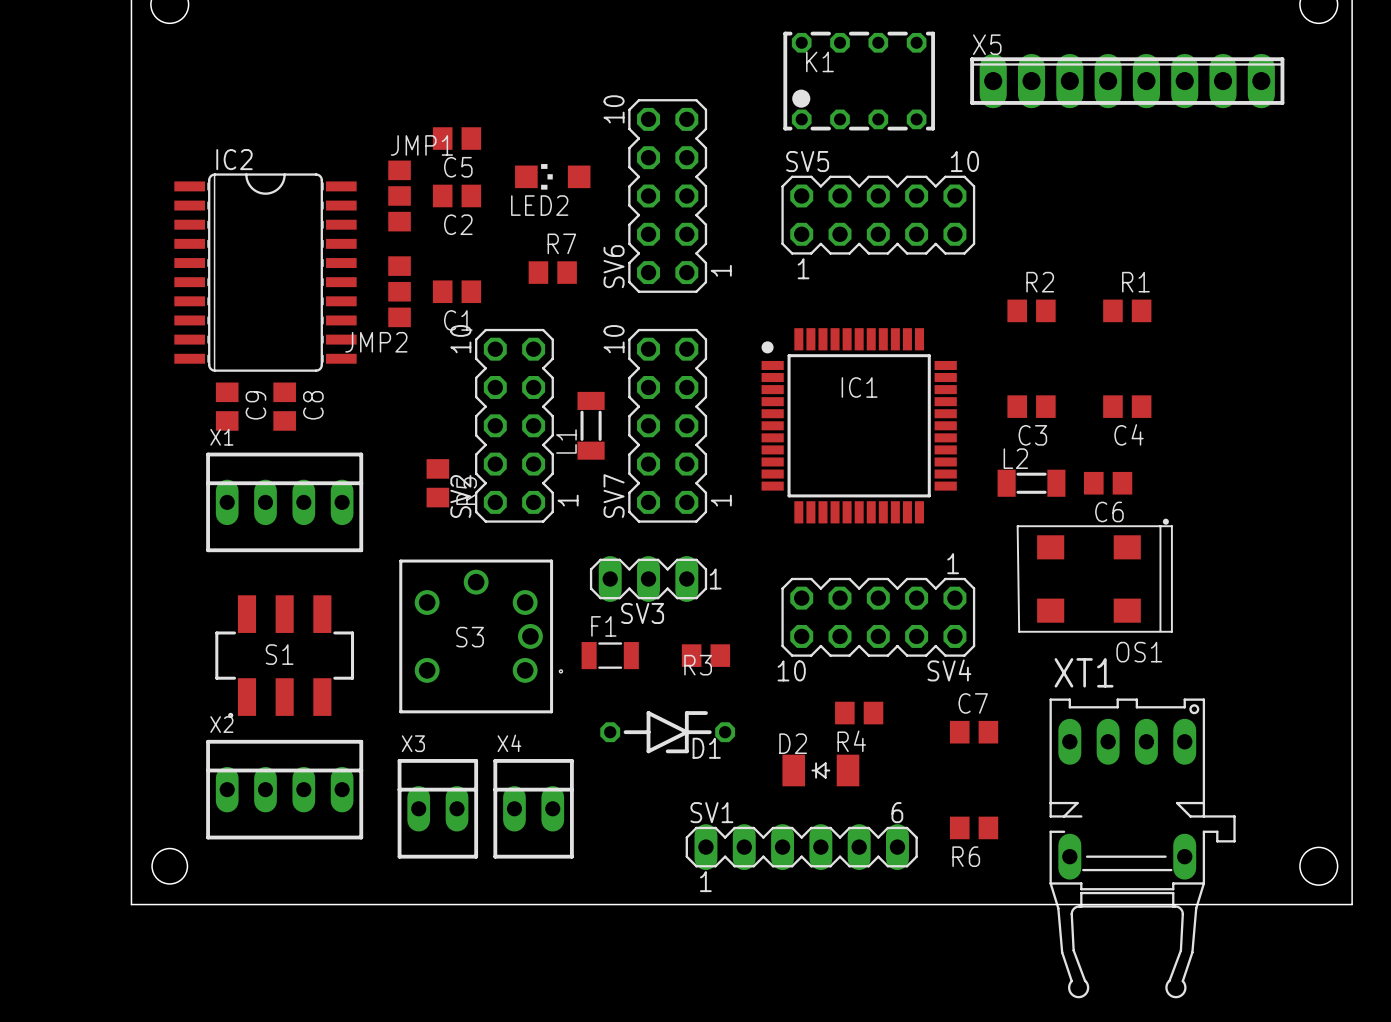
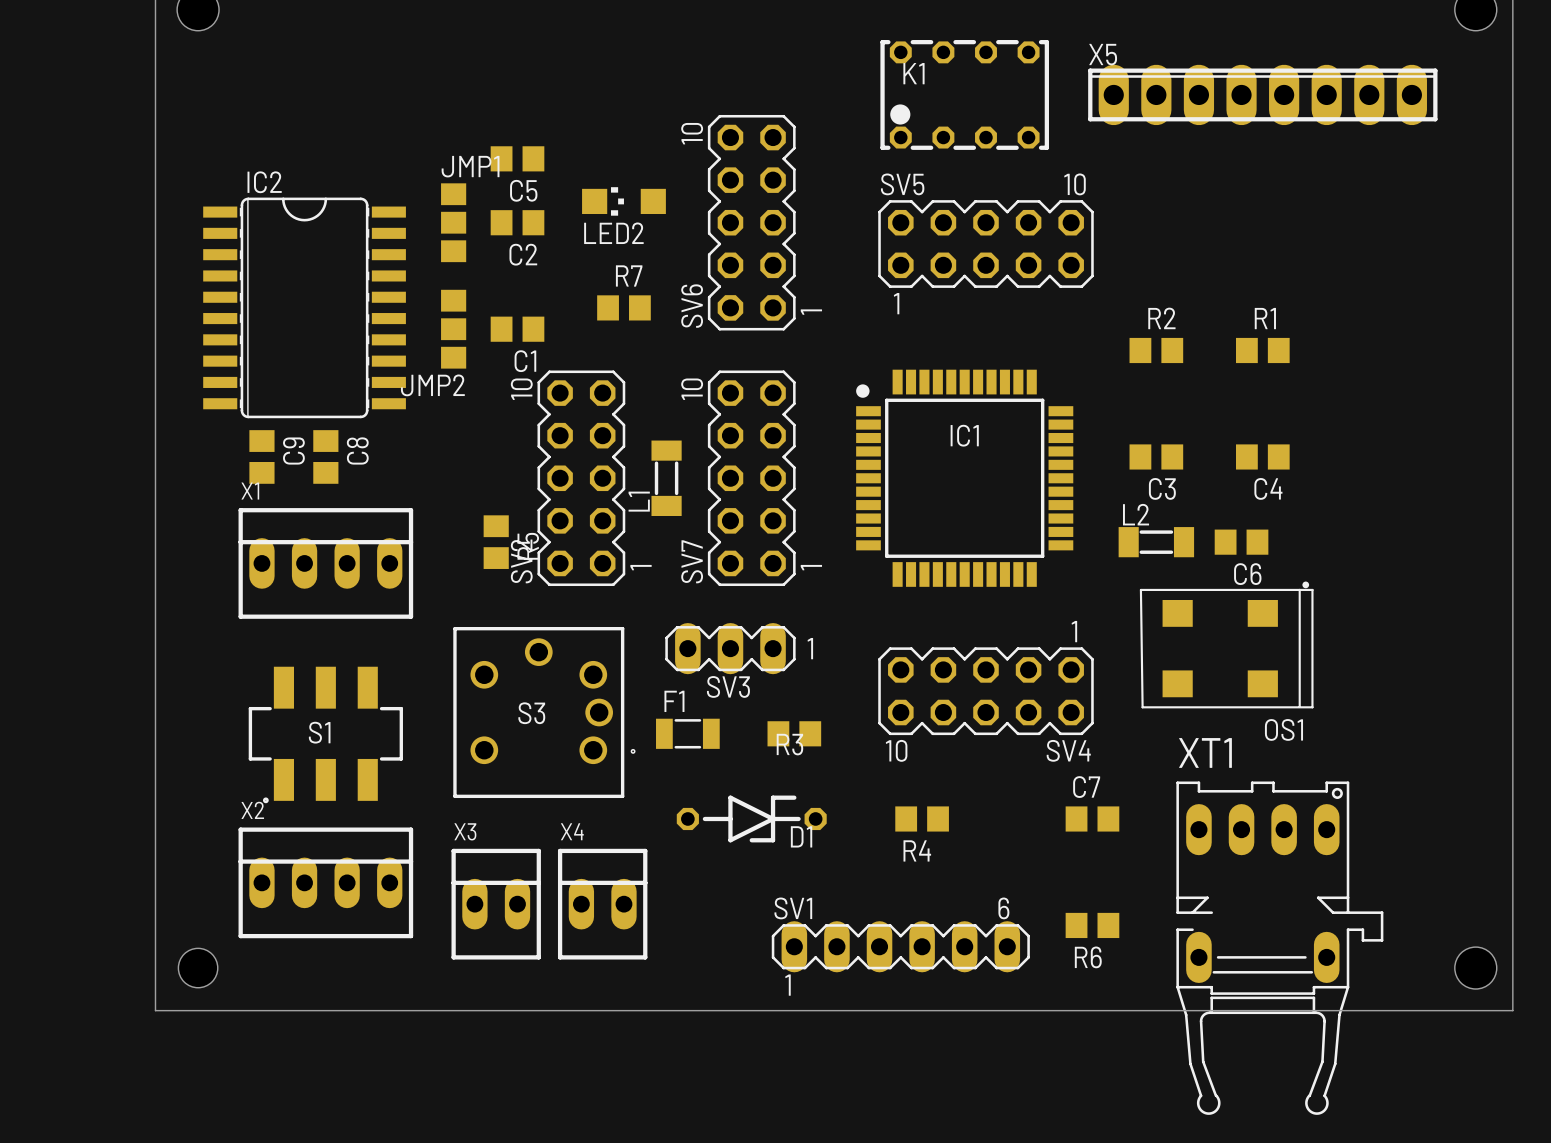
R4 position: (859, 713) -> (922, 818)
D2: (820, 770) -> none

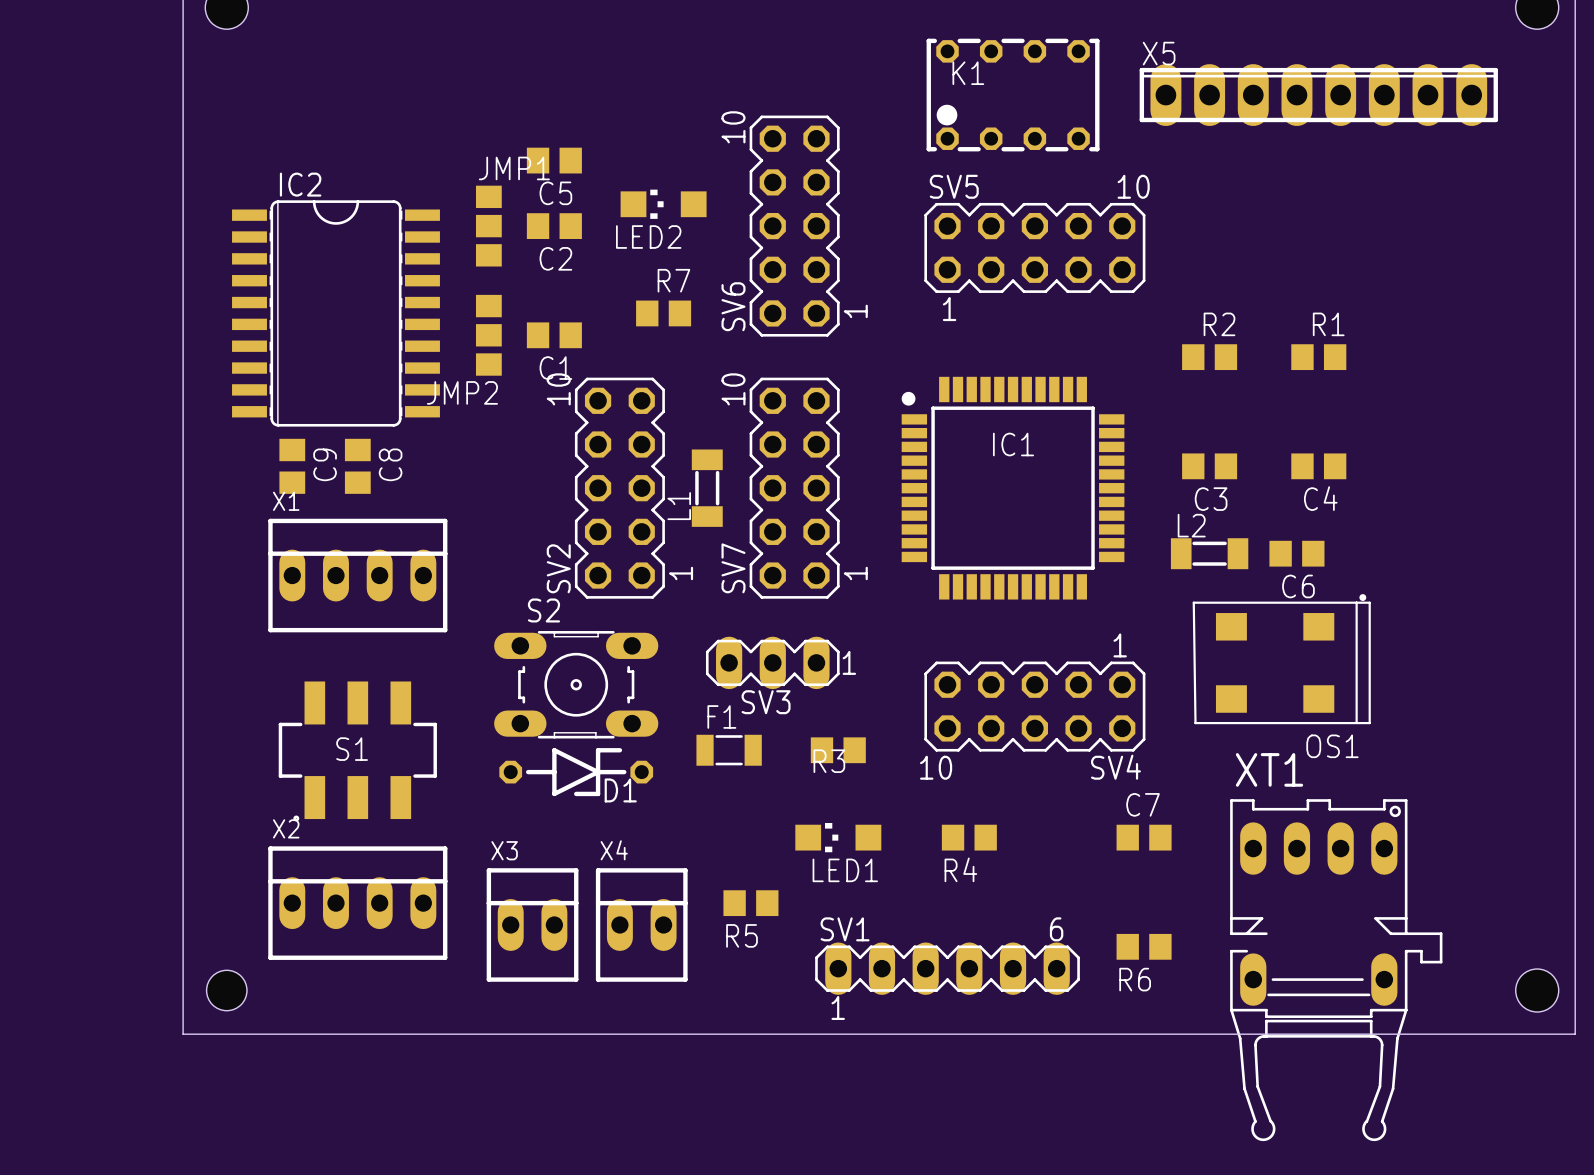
R5 rotation: 0° (496, 542) -> 90° clockwise (750, 903)
R5 position: (496, 542) -> (750, 903)
S2: none -> (576, 684)
S3: (544, 712) -> none
D1 position: (751, 818) -> (576, 772)
LED1: none -> (838, 837)

